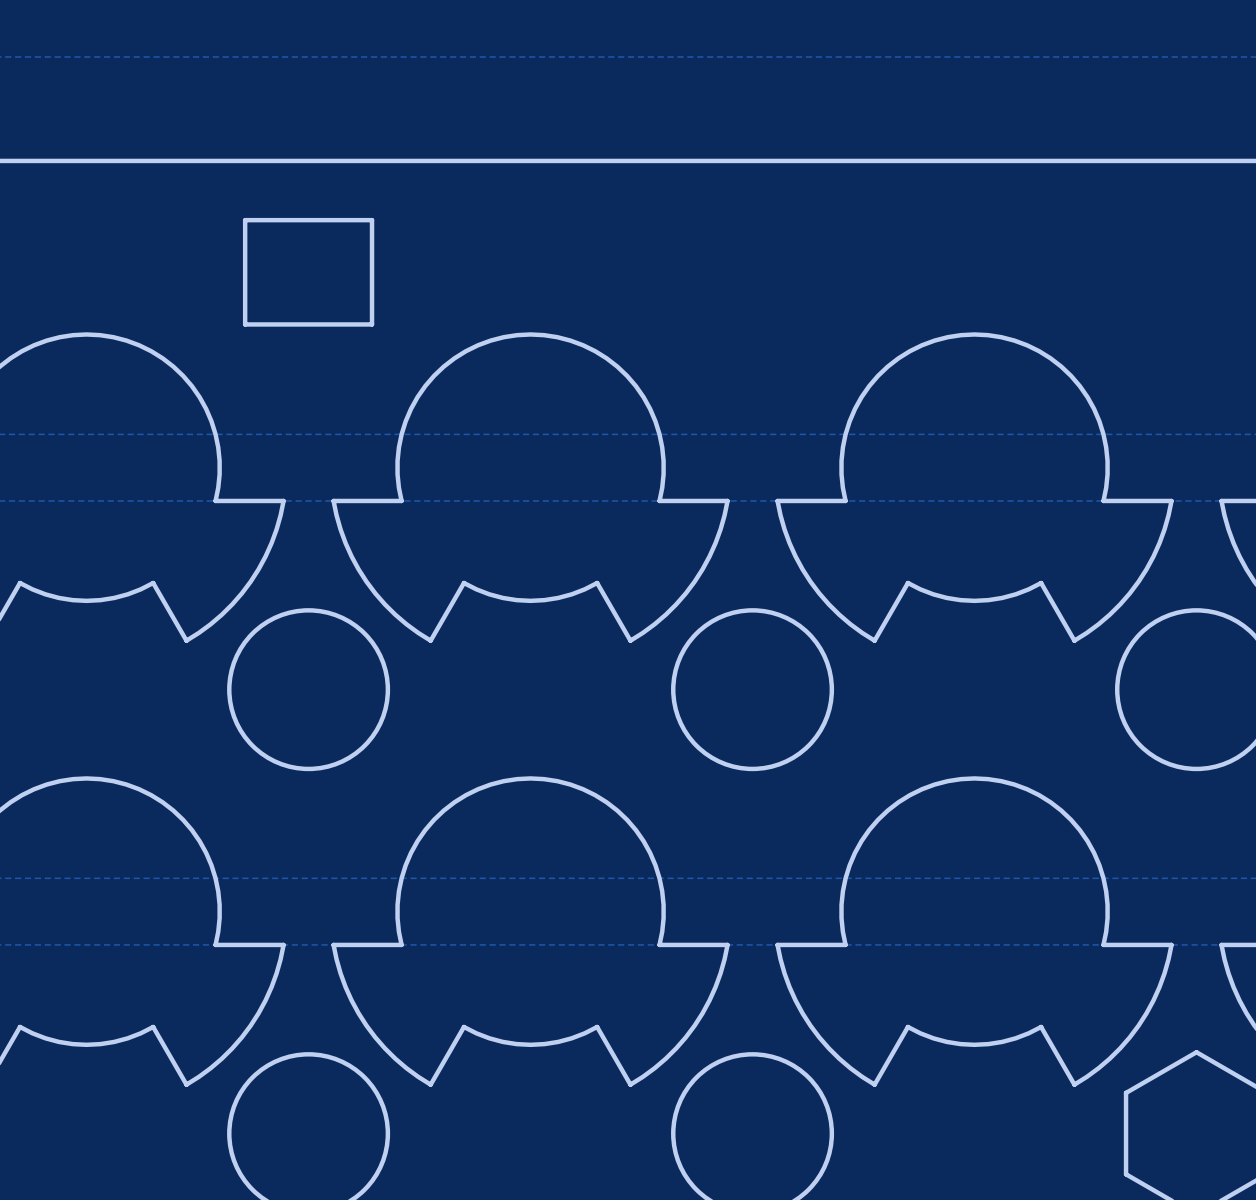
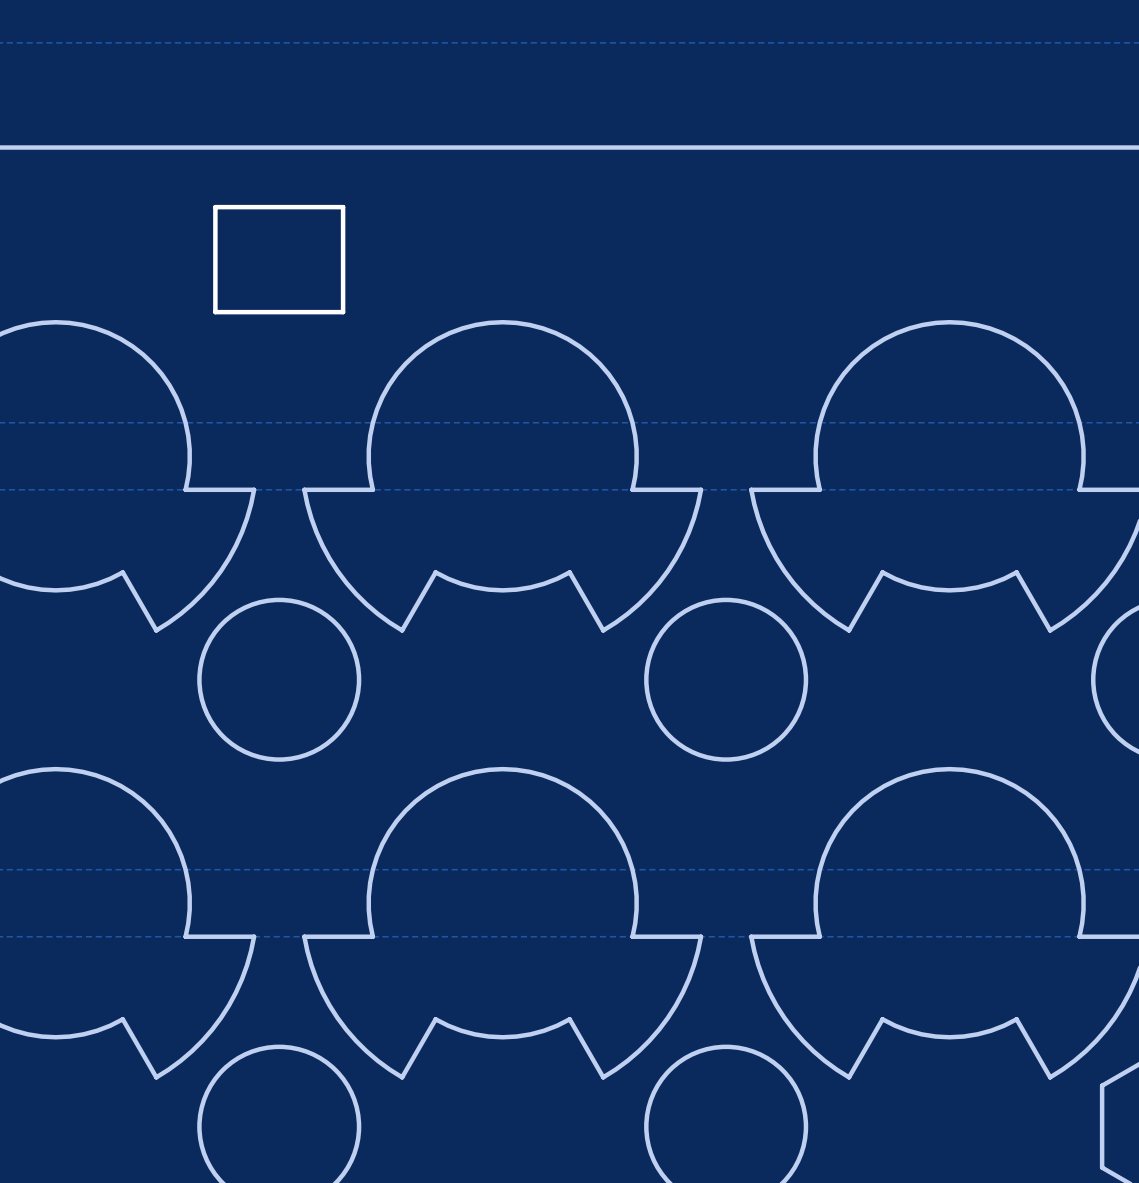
board edge: (245, 220) (245, 324) (372, 324) (372, 220) (245, 220) -> none
line: none -> (215, 207) (215, 312) (343, 312) (343, 207) (215, 207)

